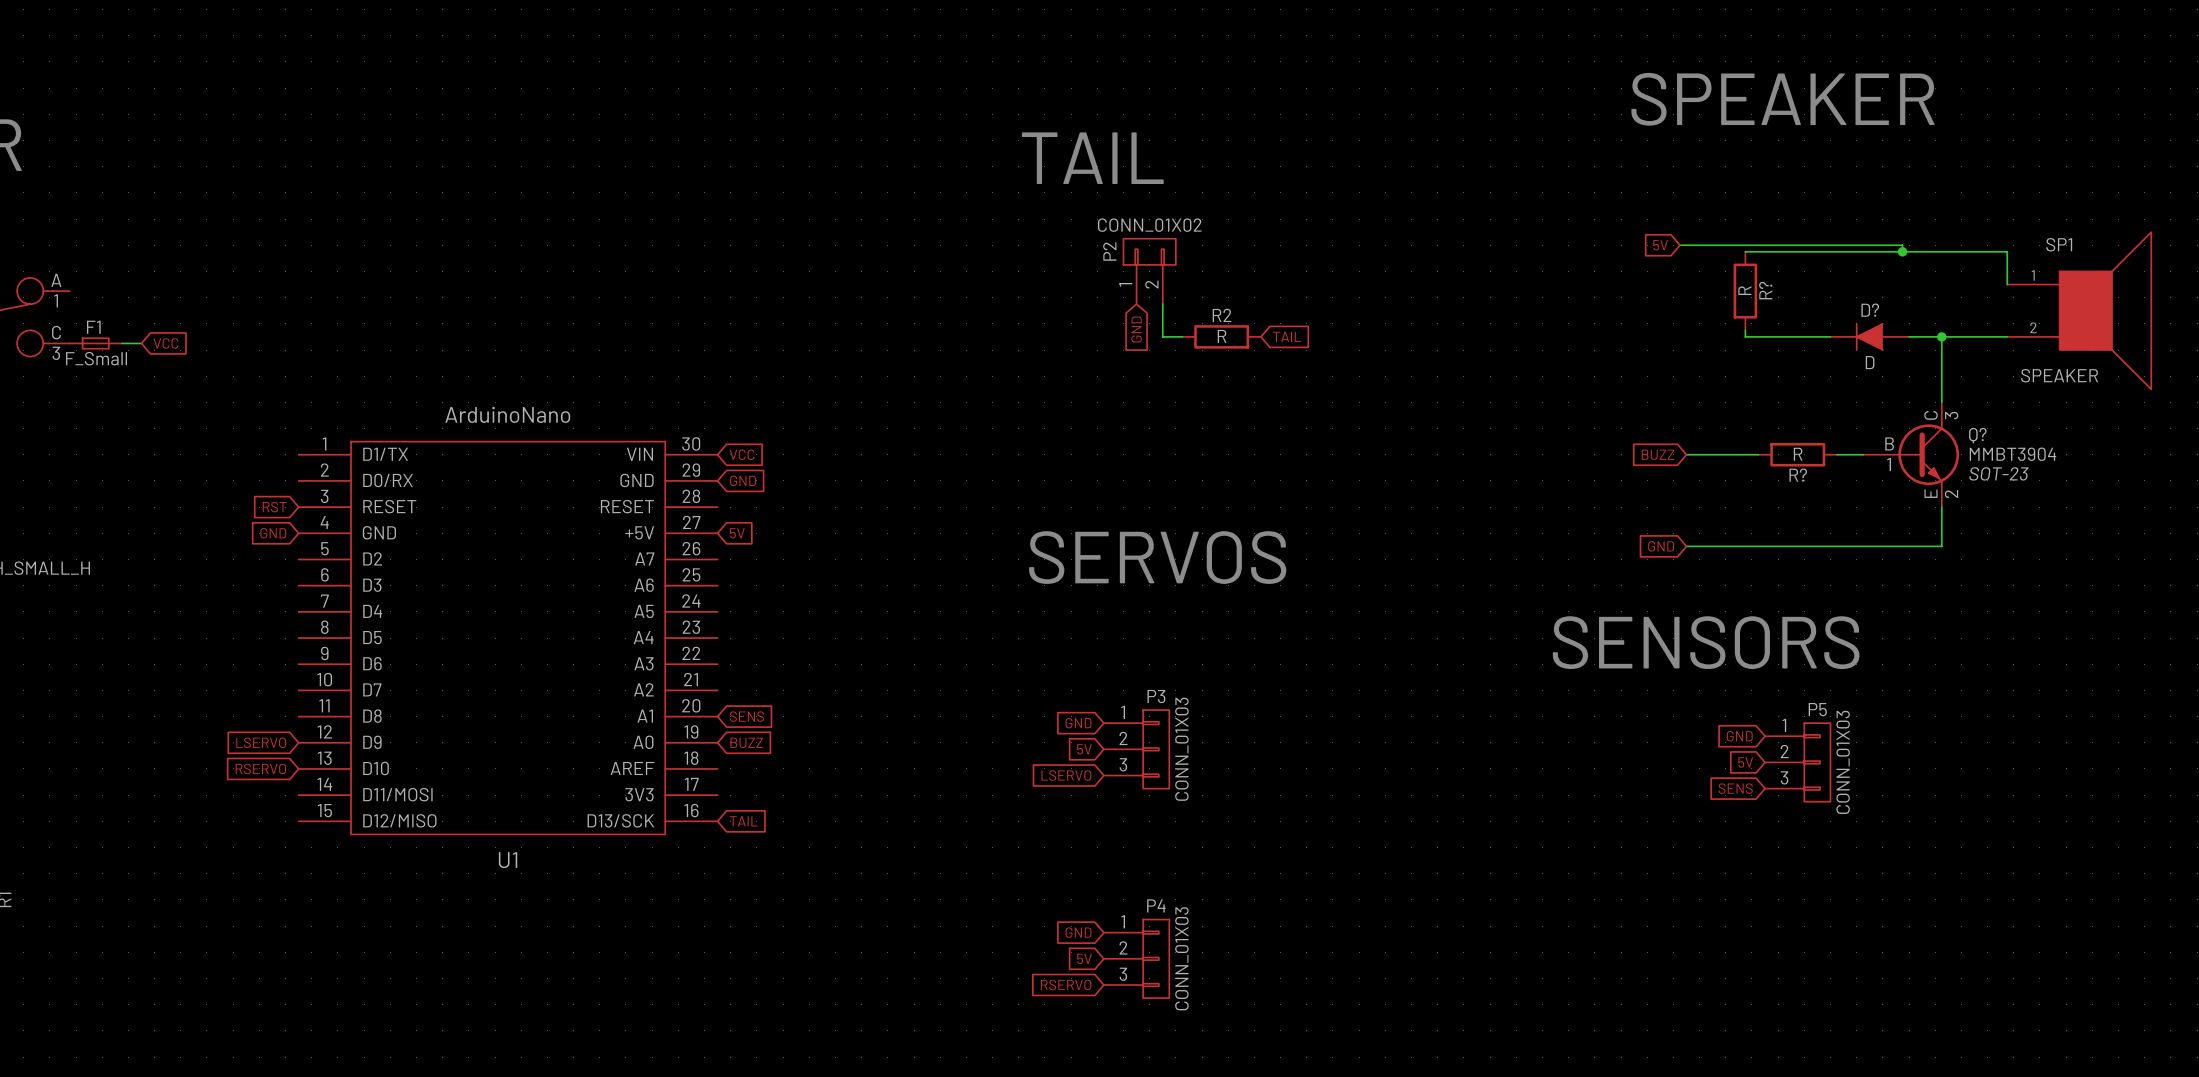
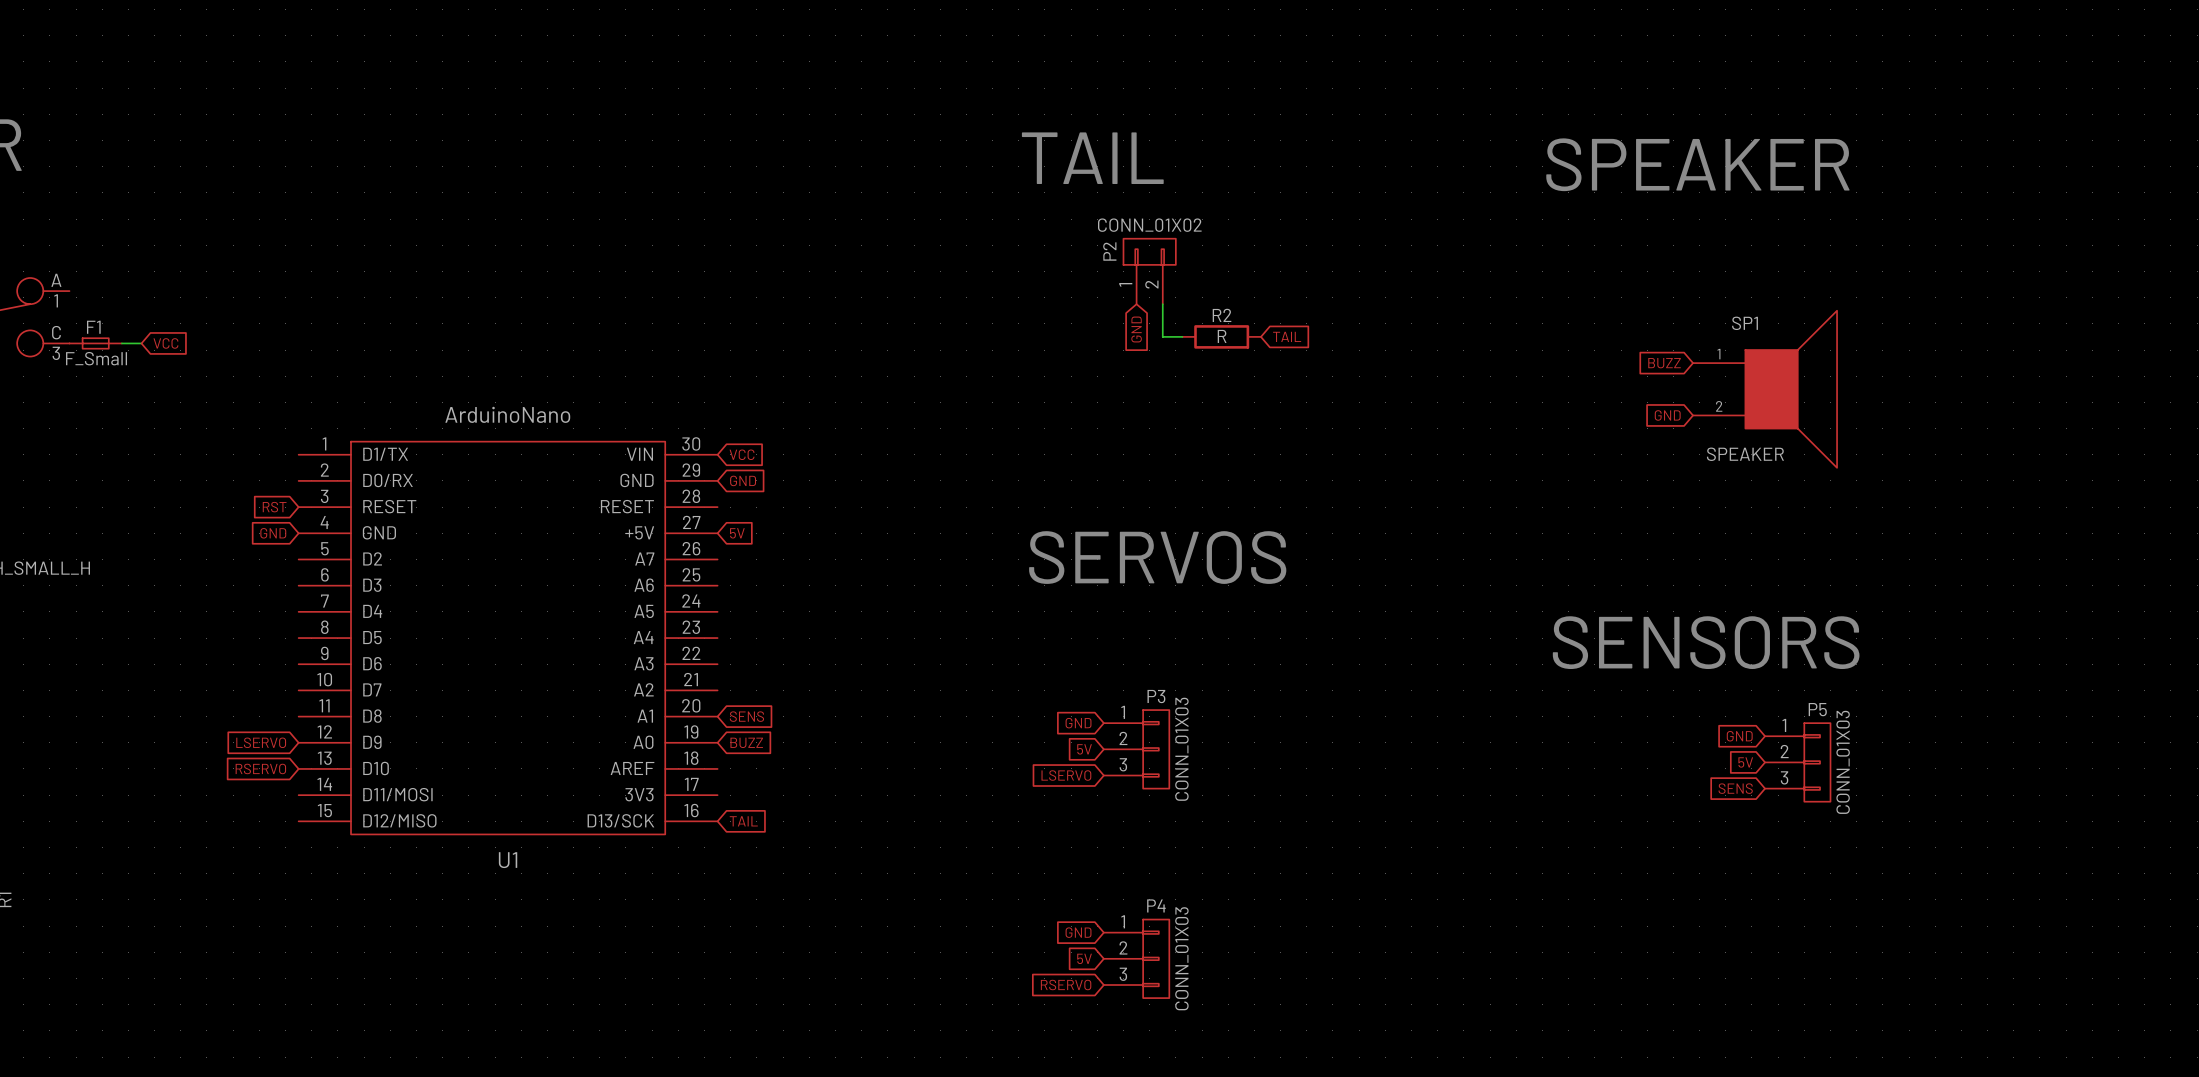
text position: SPEAKER (1783, 99) -> SPEAKER (1697, 164)
global label: 5V (1660, 245) -> none
wire: (1679, 245) (1902, 245) (1902, 251) -> none
wire: (1745, 251) (2007, 251) (2007, 284) -> none
junction: (1902, 251) -> none
R?: R (1745, 291) -> none
SP1 position: (2079, 310) -> (1765, 389)
wire: (1745, 330) (1745, 336) (1830, 336) -> none
D?: D (1869, 336) -> none
wire: (1909, 336) (2007, 336) -> none
wire: (1941, 336) (1941, 402) -> none
junction: (1941, 336) -> none
global label position: BUZZ (1657, 454) -> BUZZ (1664, 363)
wire: (1686, 454) (1758, 454) -> none
R?: R (1797, 454) -> none
wire: (1837, 454) (1863, 454) -> none
Q?: MMBT3904 (1911, 454) -> none
wire: (1941, 507) (1941, 546) (1686, 546) -> none
global label position: GND (1661, 546) -> GND (1667, 415)

